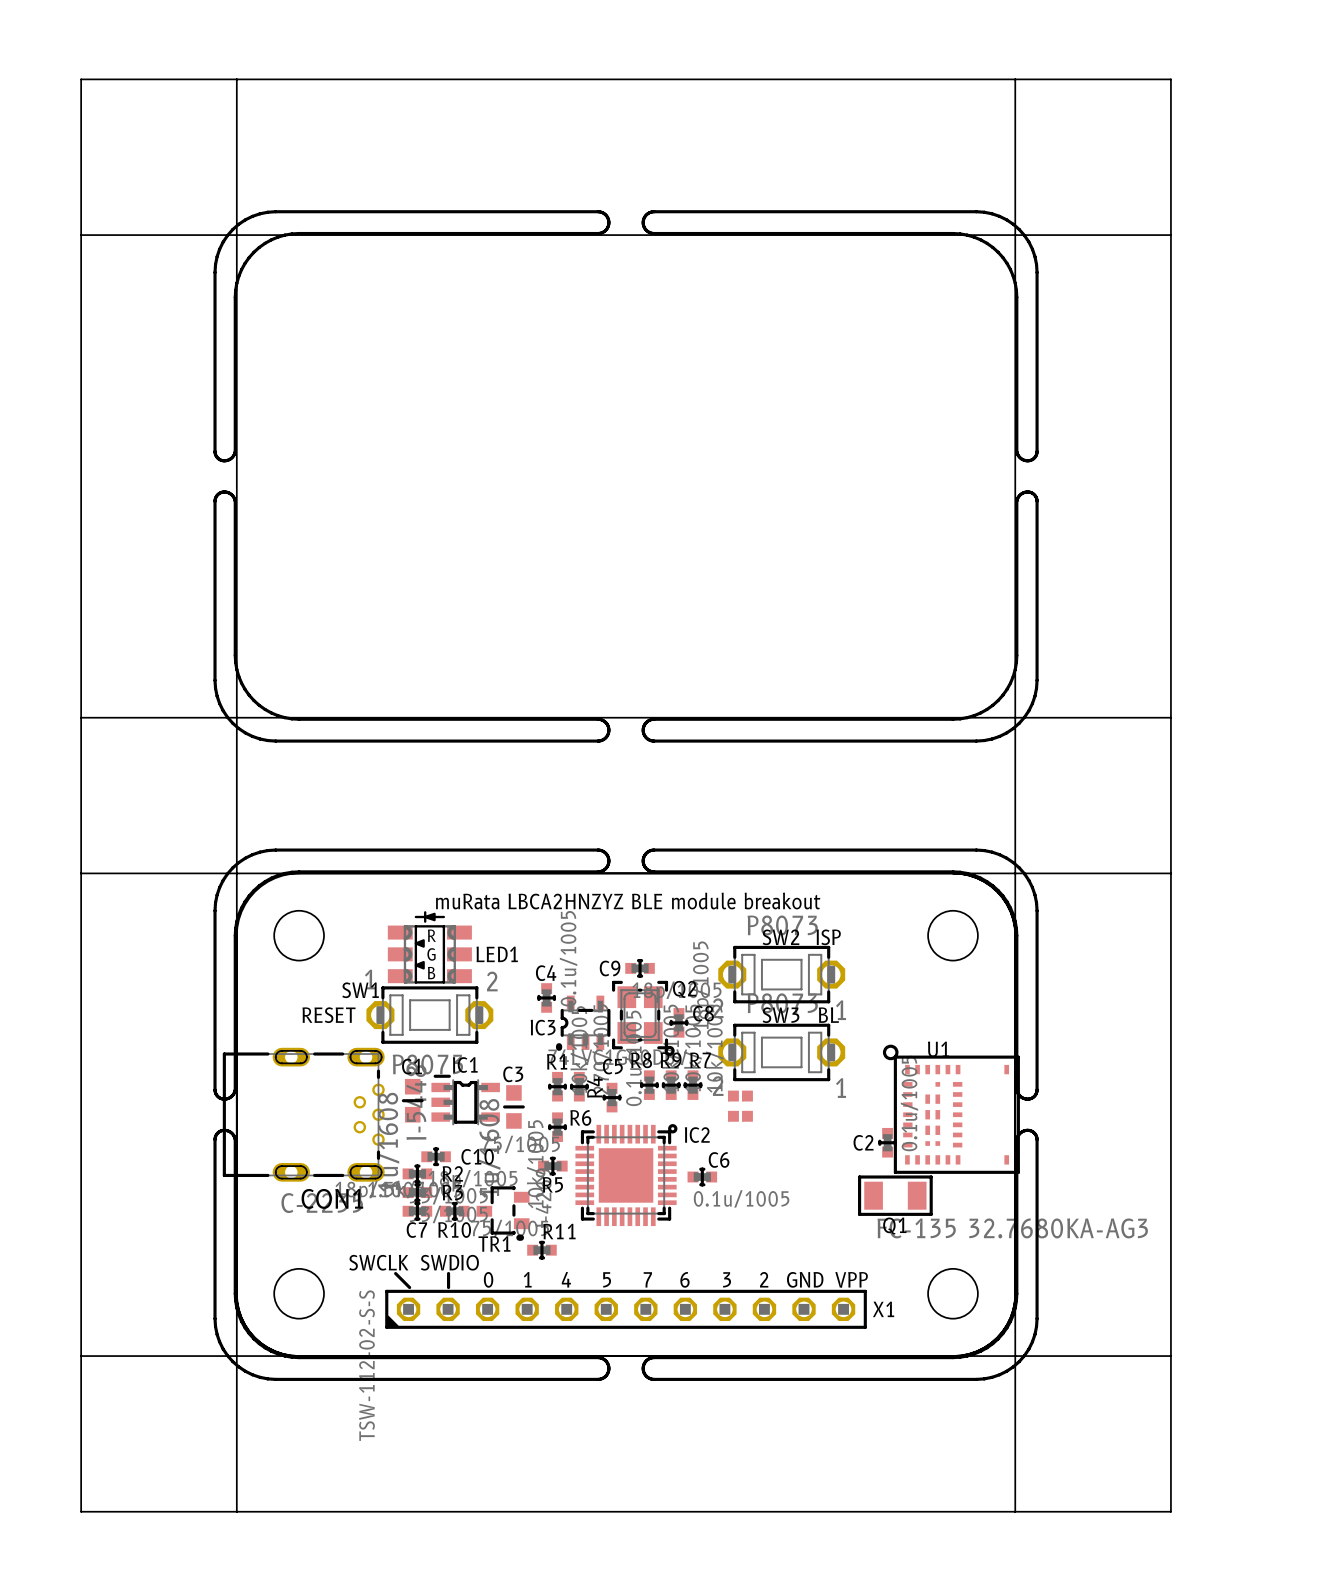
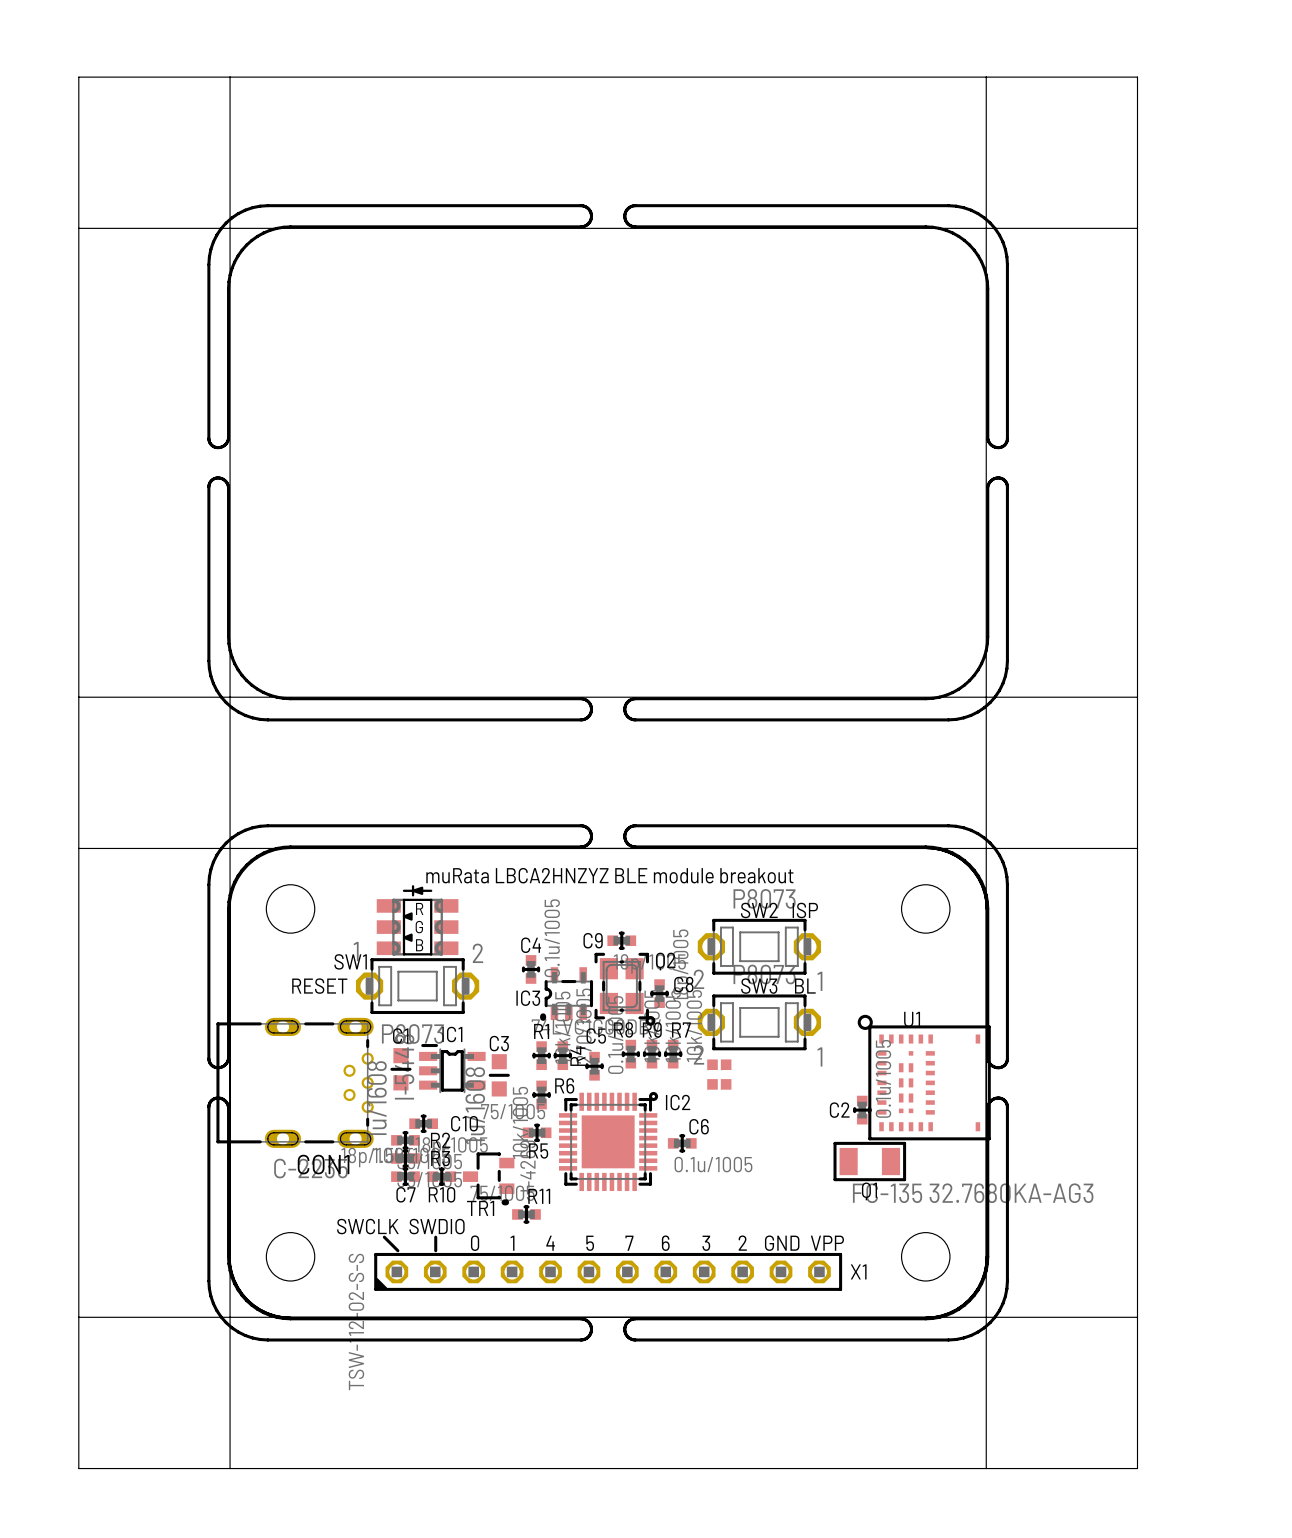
LED1 name: LED1 (497, 954) -> none

